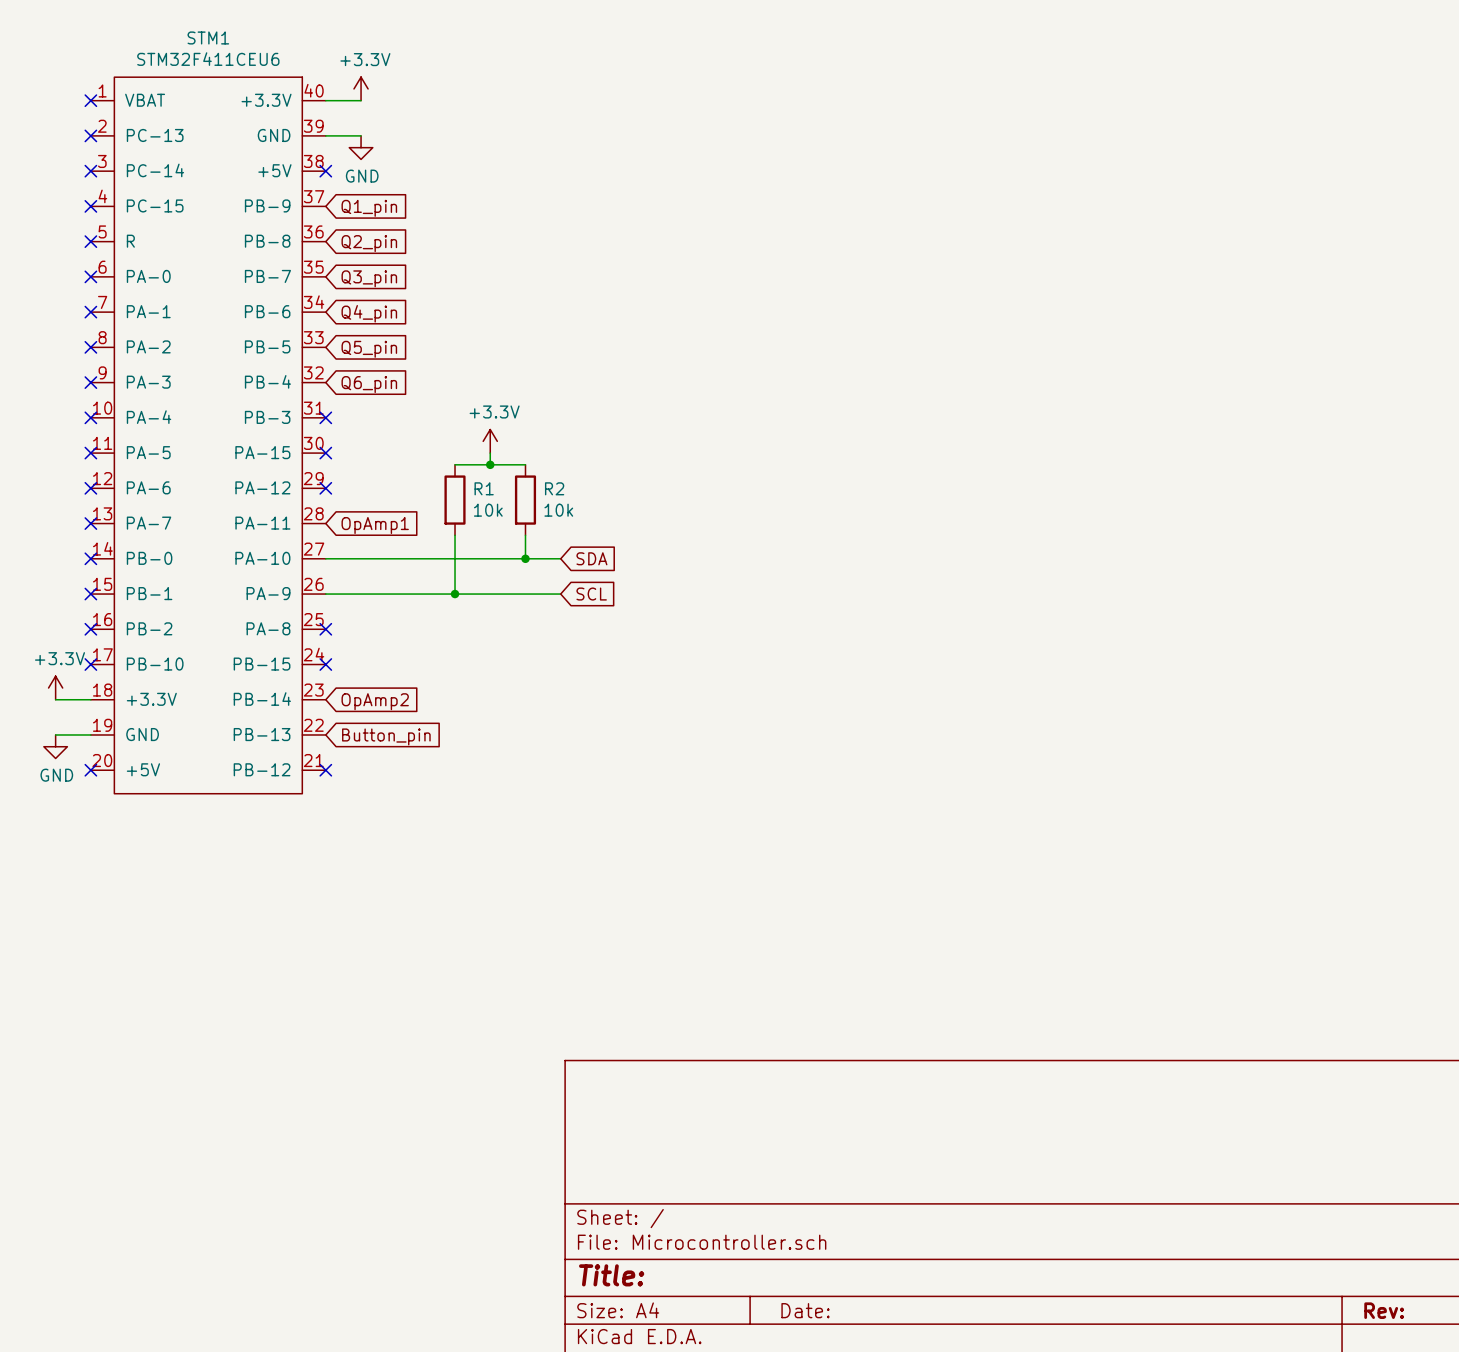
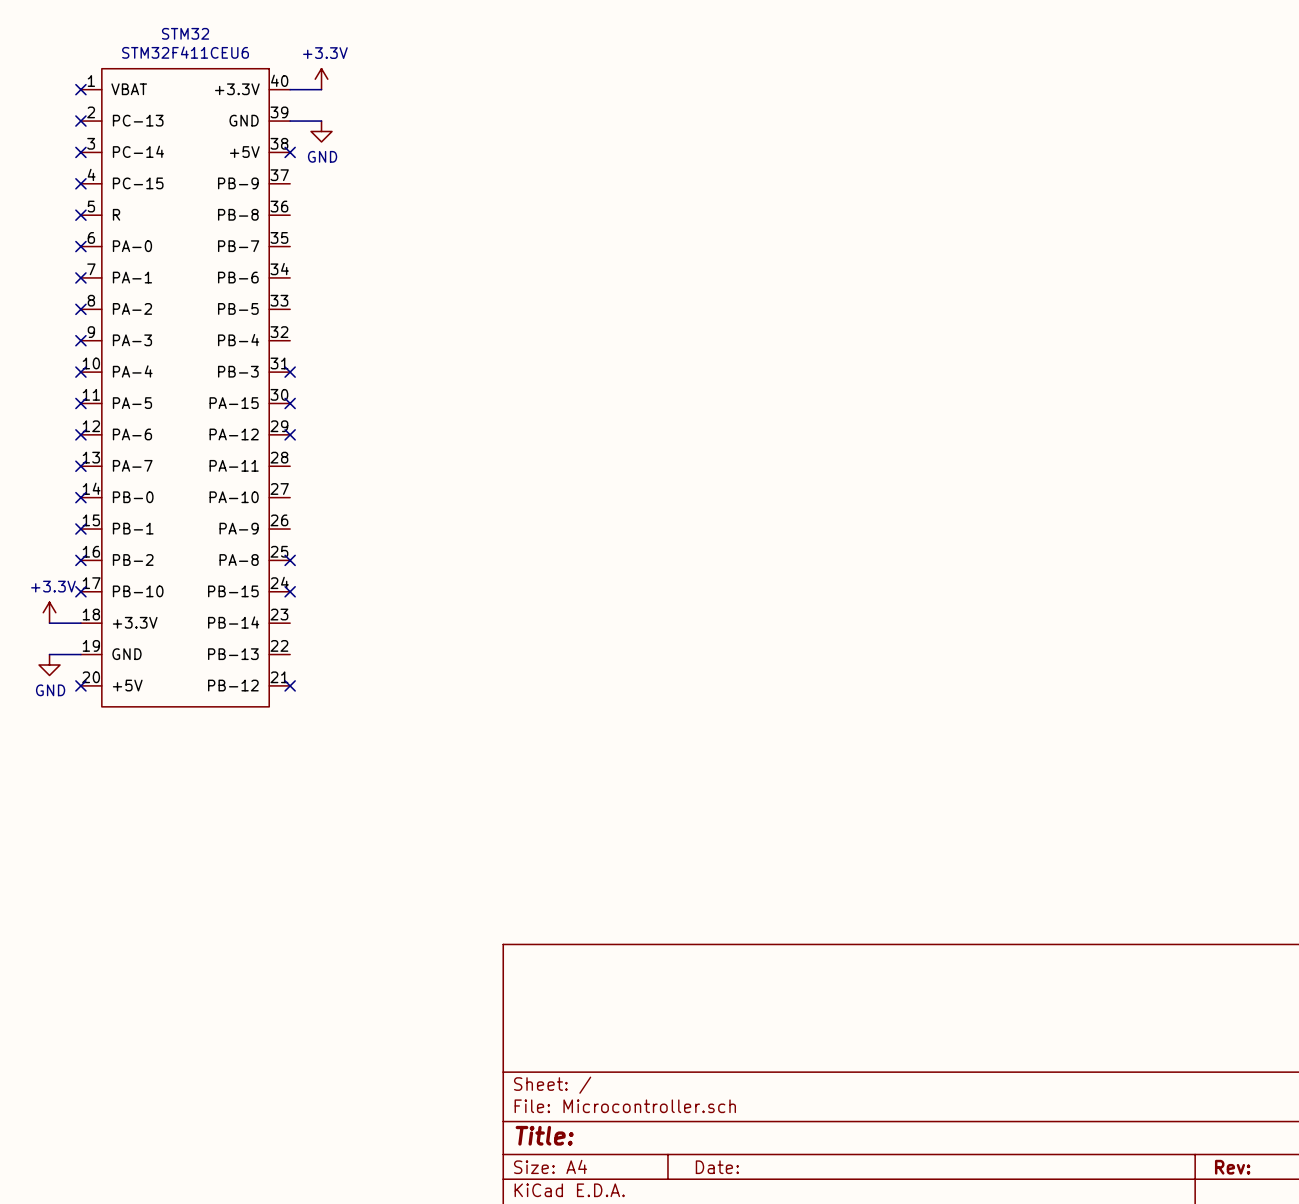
STM1 name: STM1 (208, 37) -> STM32 (185, 33)
global label: Q1_pin (369, 208) -> none
global label: Q2_pin (369, 243) -> none
global label: Q3_pin (369, 278) -> none
global label: Q4_pin (369, 313) -> none
global label: Q5_pin (369, 349) -> none
global label: Q6_pin (369, 384) -> none
power symbol: +3.3V (490, 441) -> none
wire: (490, 453) (490, 464) -> none
wire: (455, 464) (525, 464) -> none
junction: (490, 464) -> none
R1: 10k (455, 500) -> none
R2: 10k (525, 500) -> none
global label: OpAmp1 (375, 525) -> none
wire: (455, 535) (455, 594) -> none
wire: (525, 535) (525, 558) -> none
wire: (325, 558) (560, 558) -> none
junction: (525, 558) -> none
global label: SDA (591, 558) -> none
wire: (325, 594) (560, 594) -> none
junction: (455, 594) -> none
global label: SCL (591, 594) -> none
global label: OpAmp2 (375, 701) -> none
global label: Button_pin (386, 736) -> none

